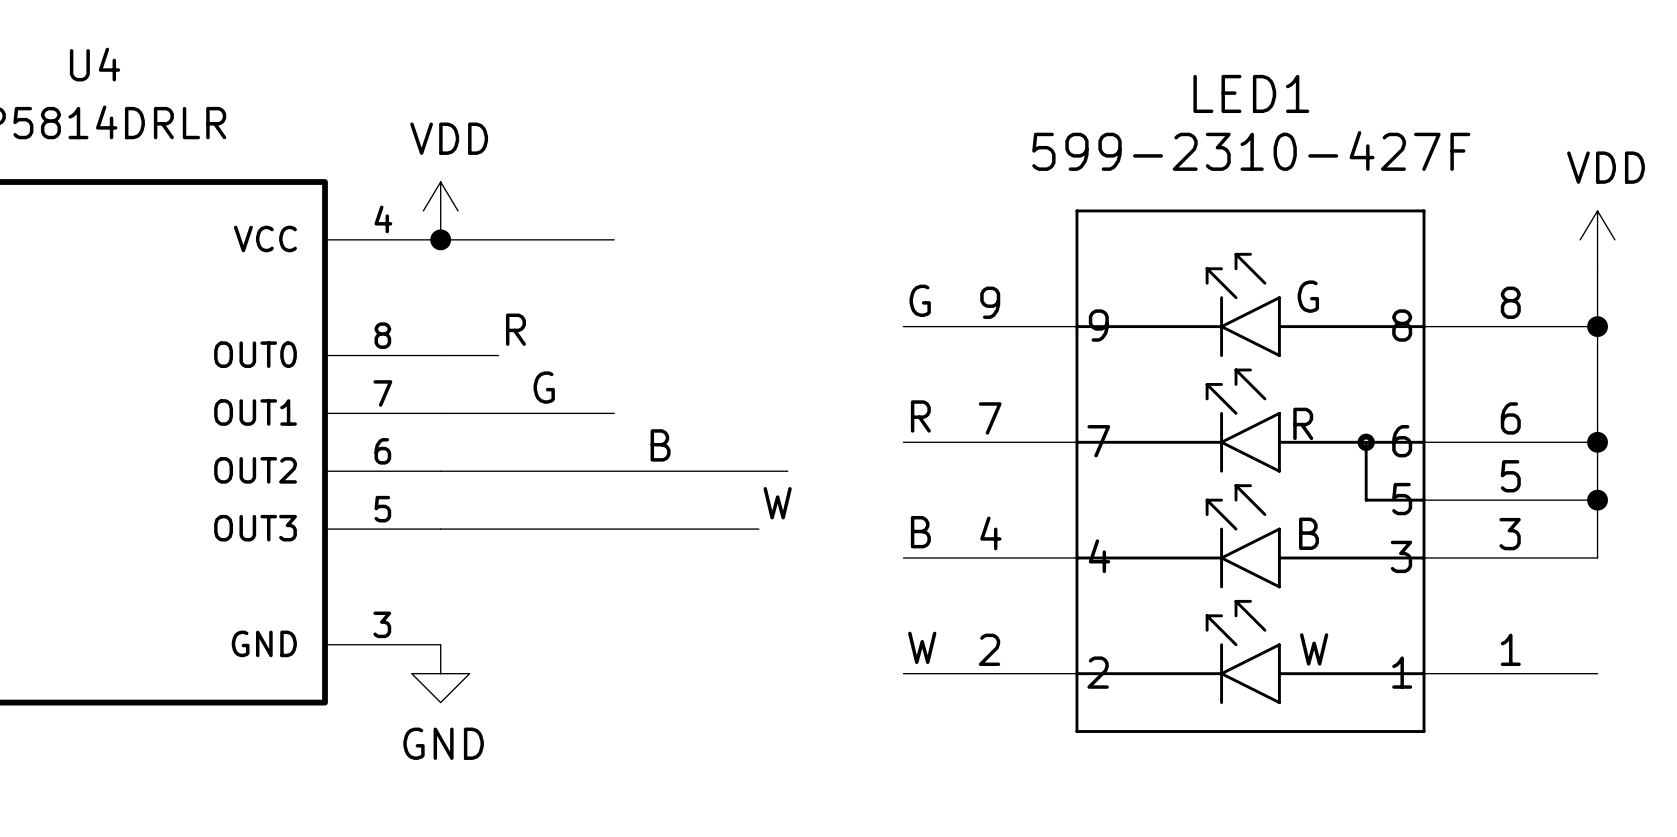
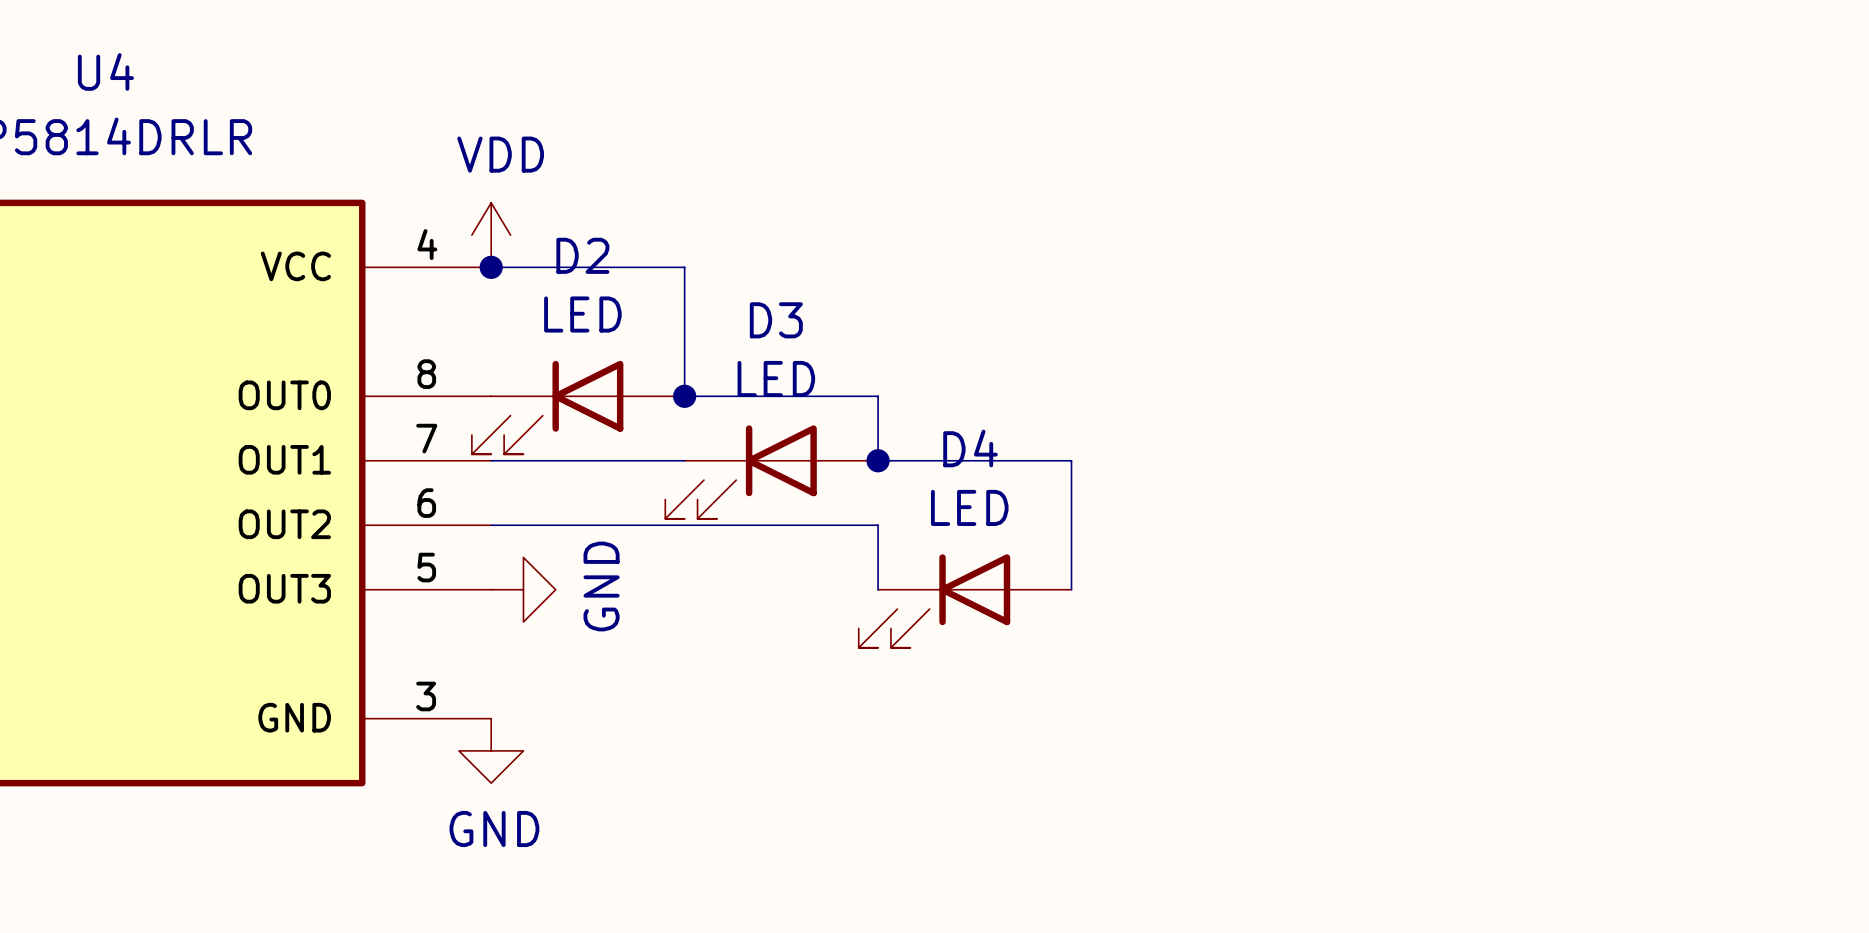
wire: none -> (684, 267) (684, 396) (878, 396) (878, 460) (1071, 460) (1071, 589)
power symbol: VDD (1597, 239) -> none
wire: (1597, 268) (1597, 557) -> none
label: G (920, 300) -> none
junction: (1597, 326) -> none
label: R (515, 329) -> none
junction: none -> (684, 396)
D2: none -> LED (578, 407)
label: G (544, 387) -> none
junction: none -> (878, 460)
label: R (920, 416) -> none
D3: none -> LED (771, 472)
junction: (1597, 442) -> none
label: B (660, 445) -> none
wire: none -> (878, 525) (878, 589)
LED1: 599-2310-427F (1250, 471) -> none
junction: (1597, 500) -> none
label: W (777, 503) -> none
wire: (440, 529) (758, 529) -> none
power symbol: none -> GND (523, 589)
label: B (920, 532) -> none
D4: none -> LED (965, 601)
label: W (922, 647) -> none

